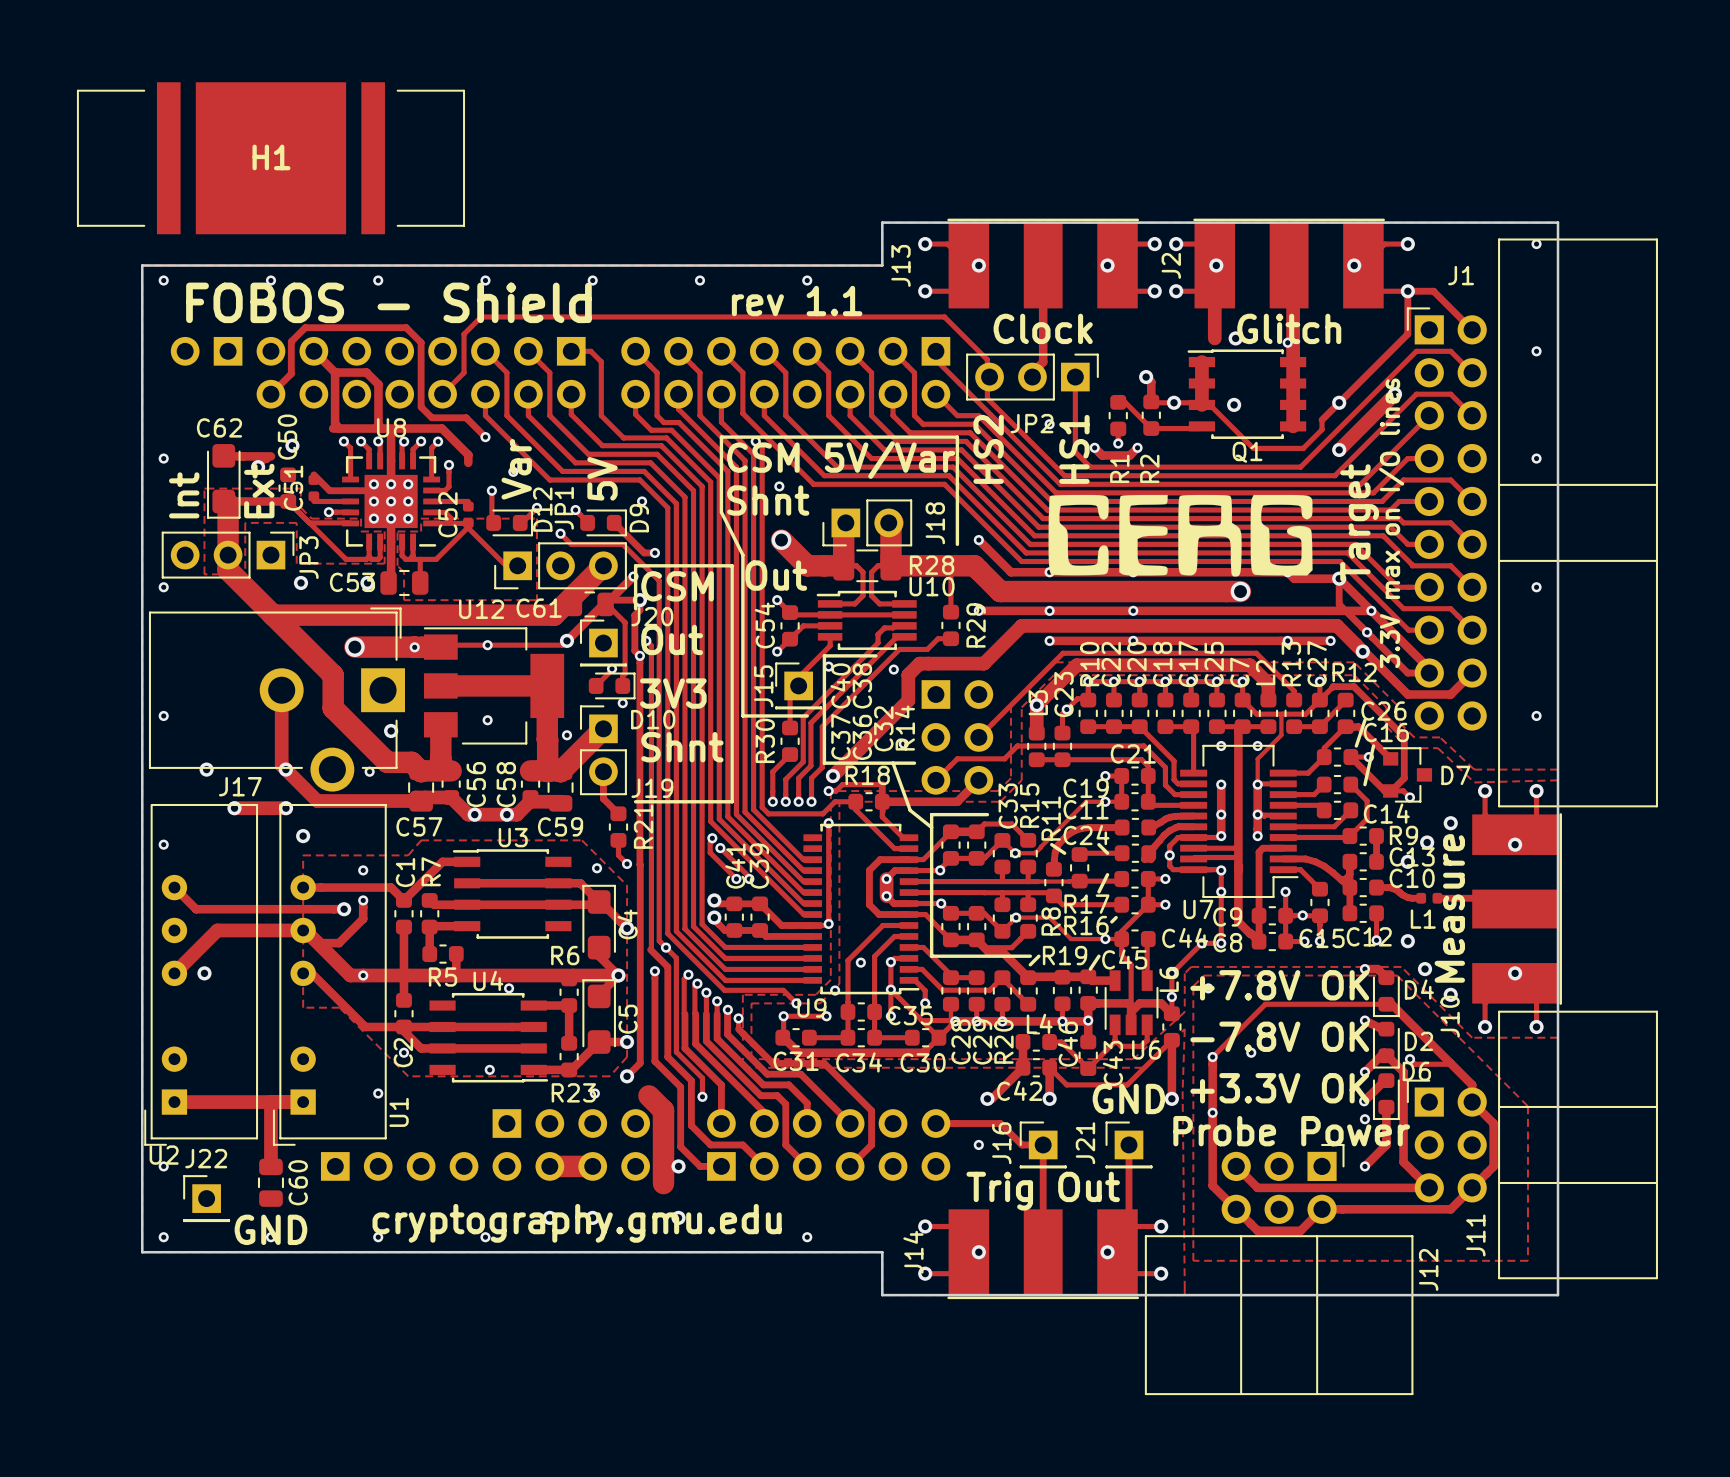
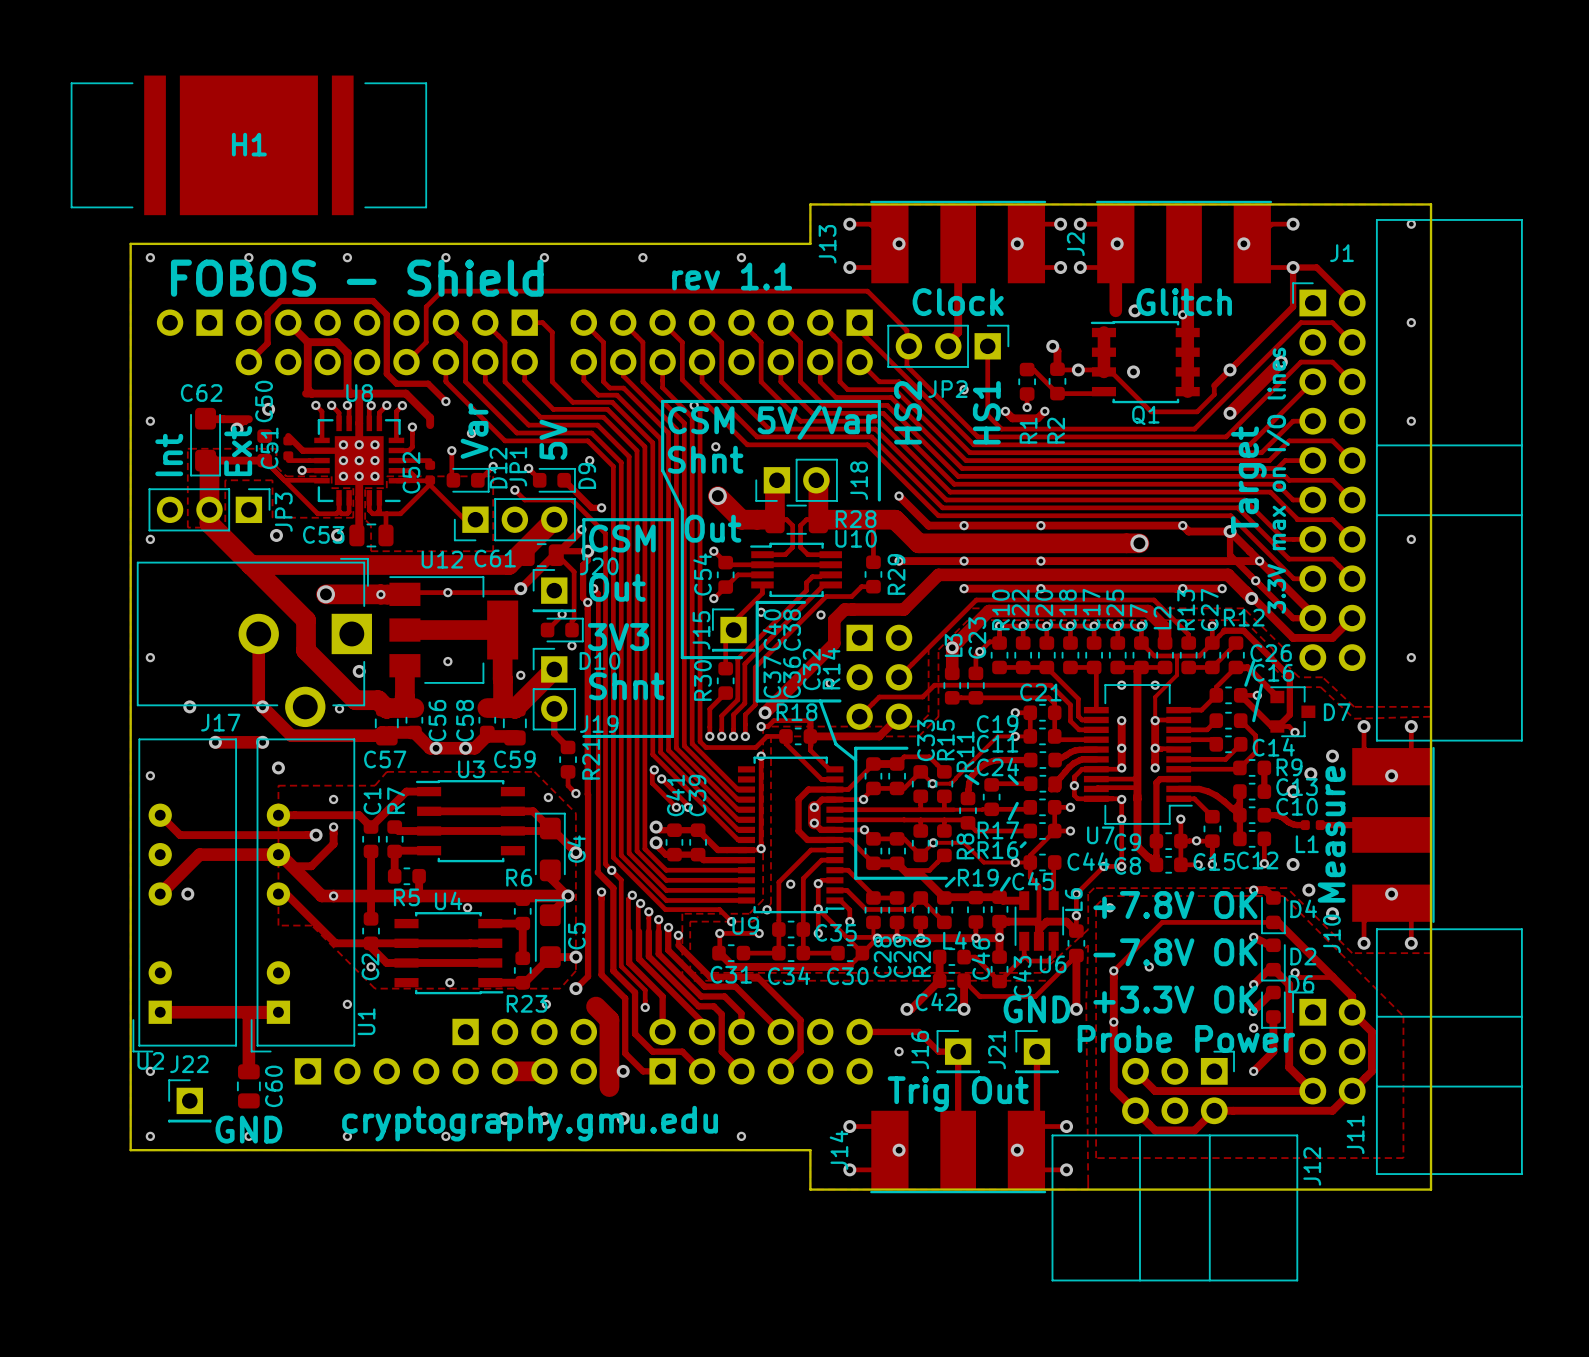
drawing: [1048, 494, 1313, 577] -> none

